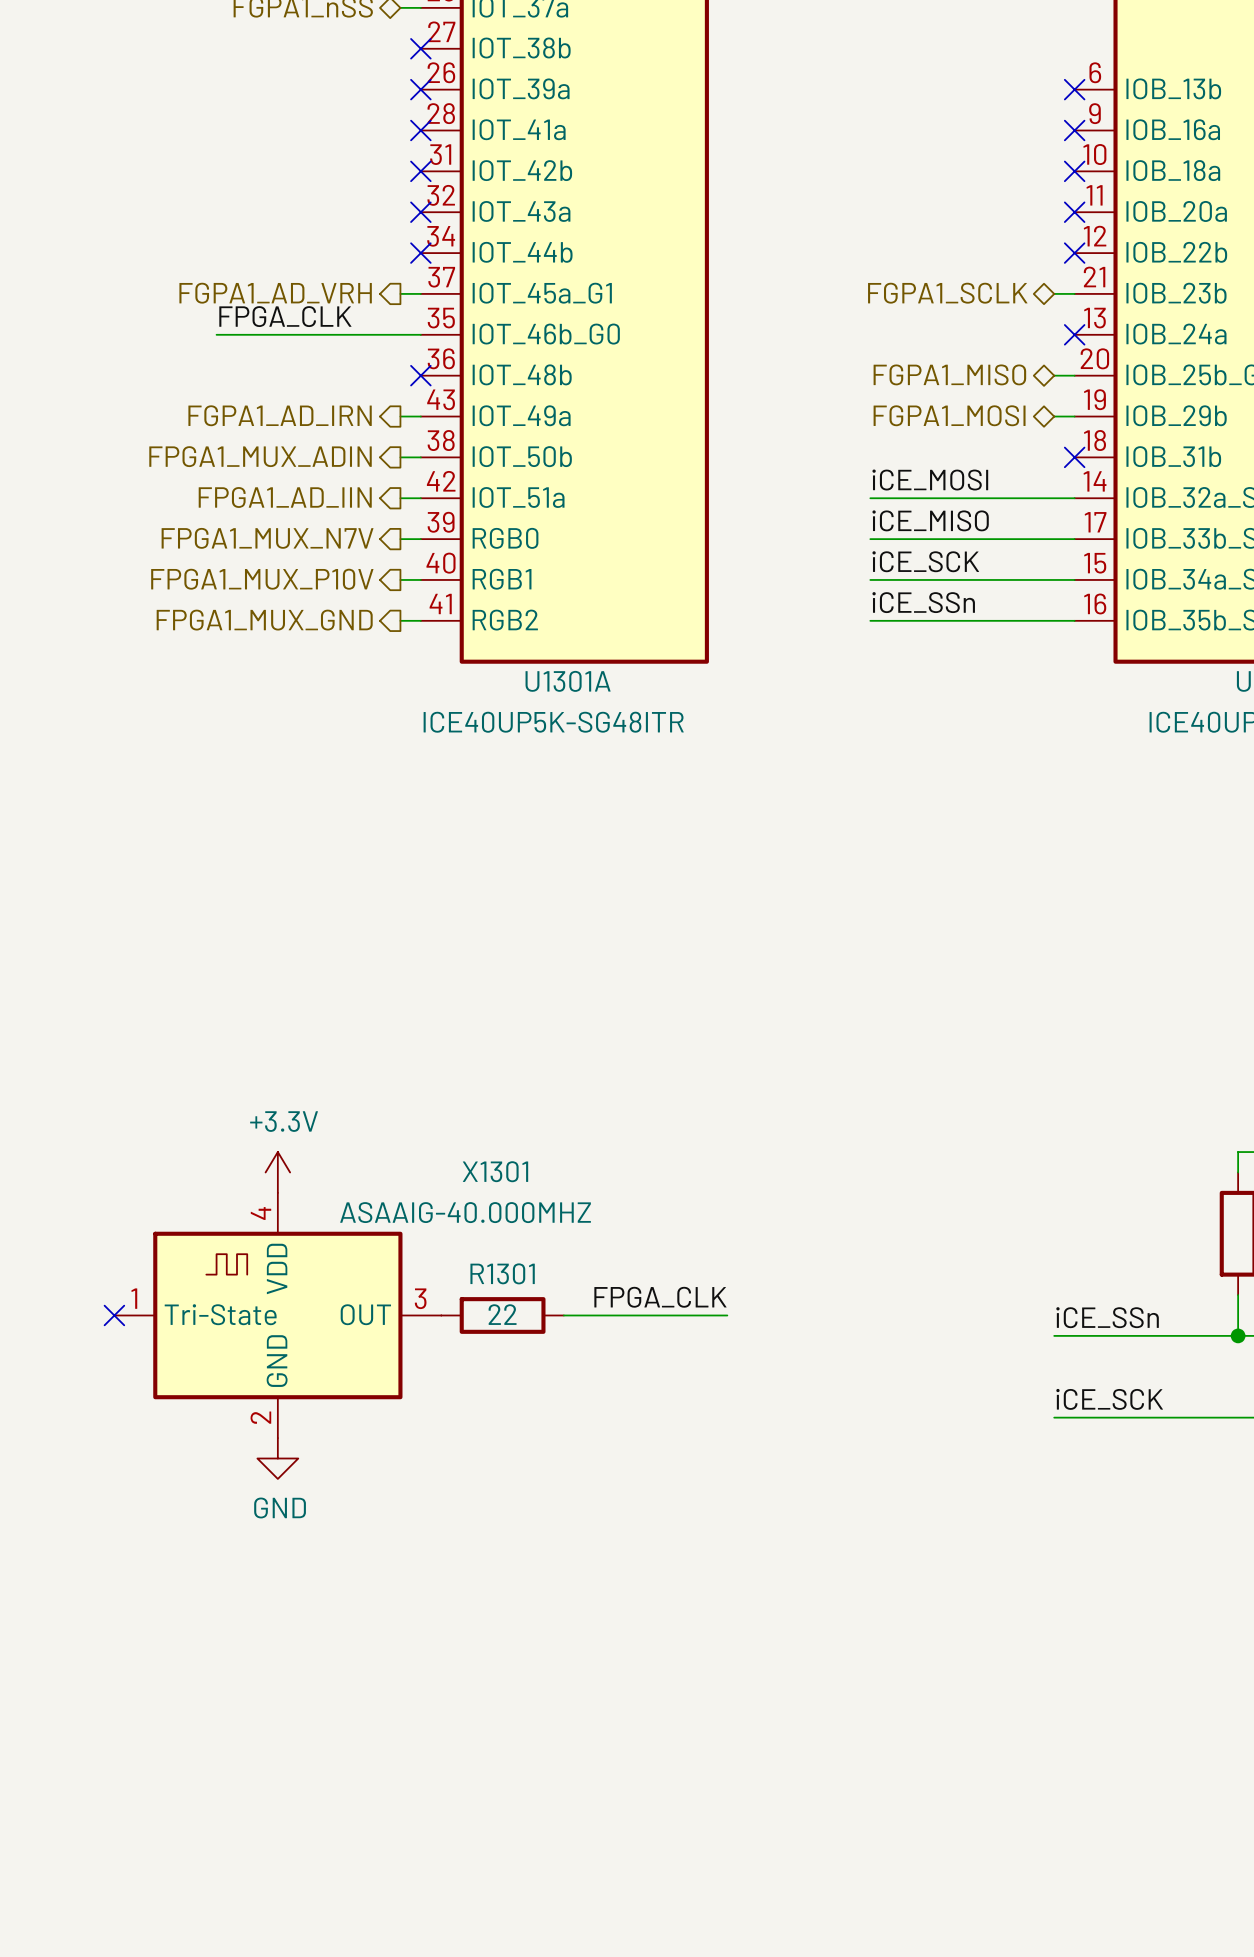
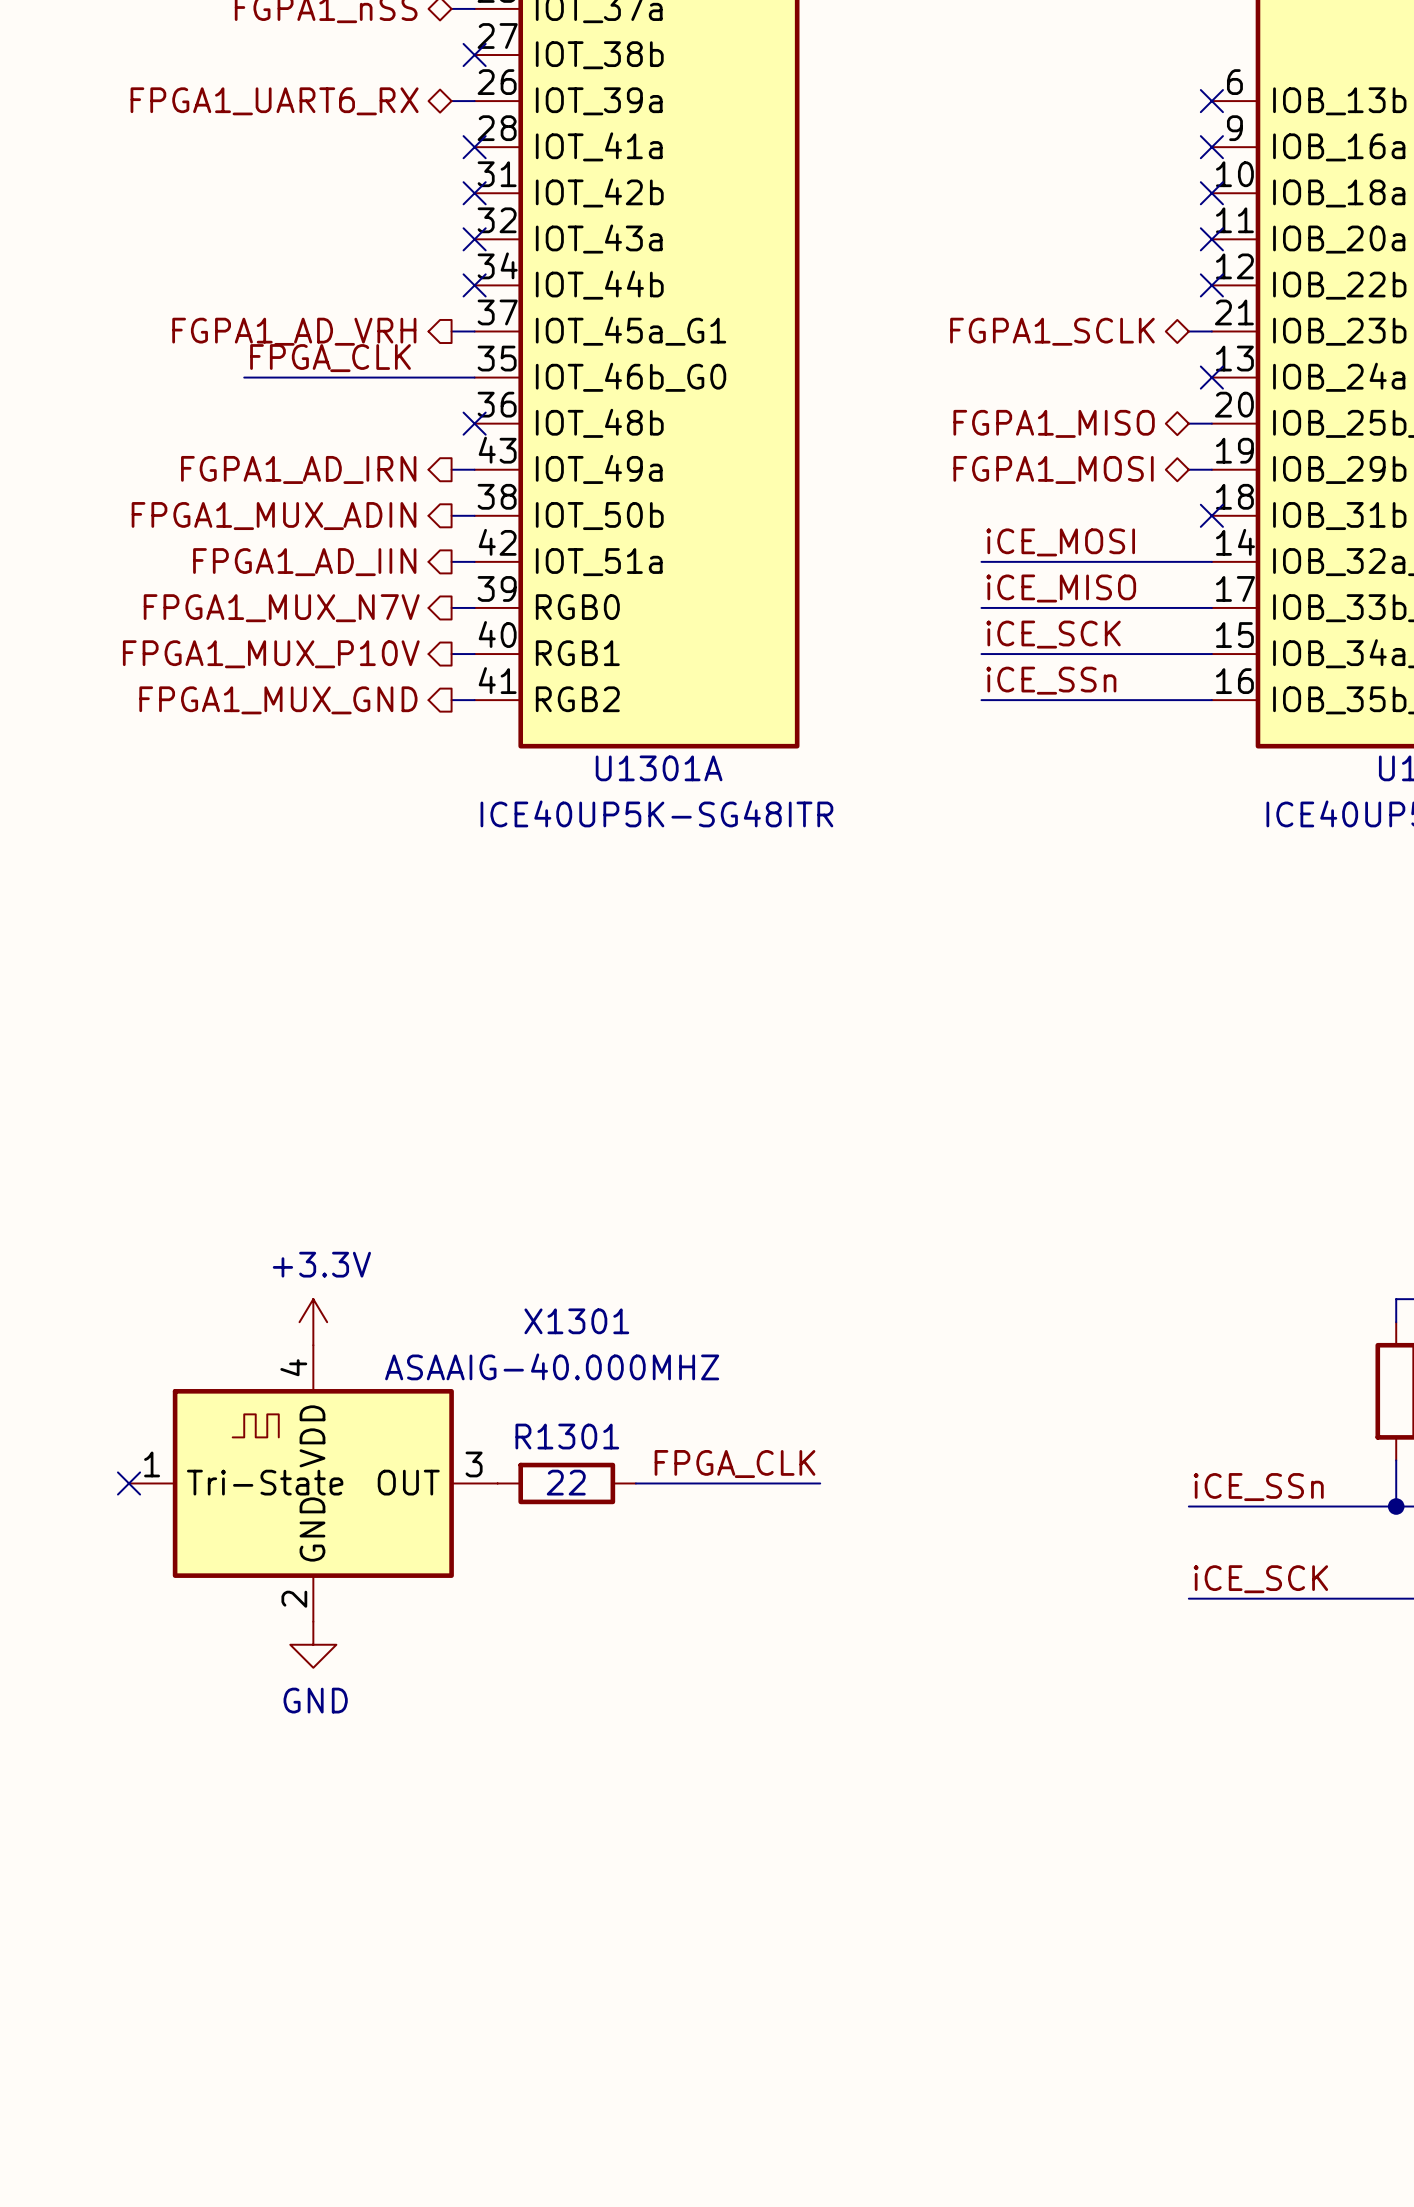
hierarchical label: none -> FPGA1_UART6_RX (274, 101)
wire: none -> (451, 101) (474, 101)
no-connect mark: (420, 89) -> none

